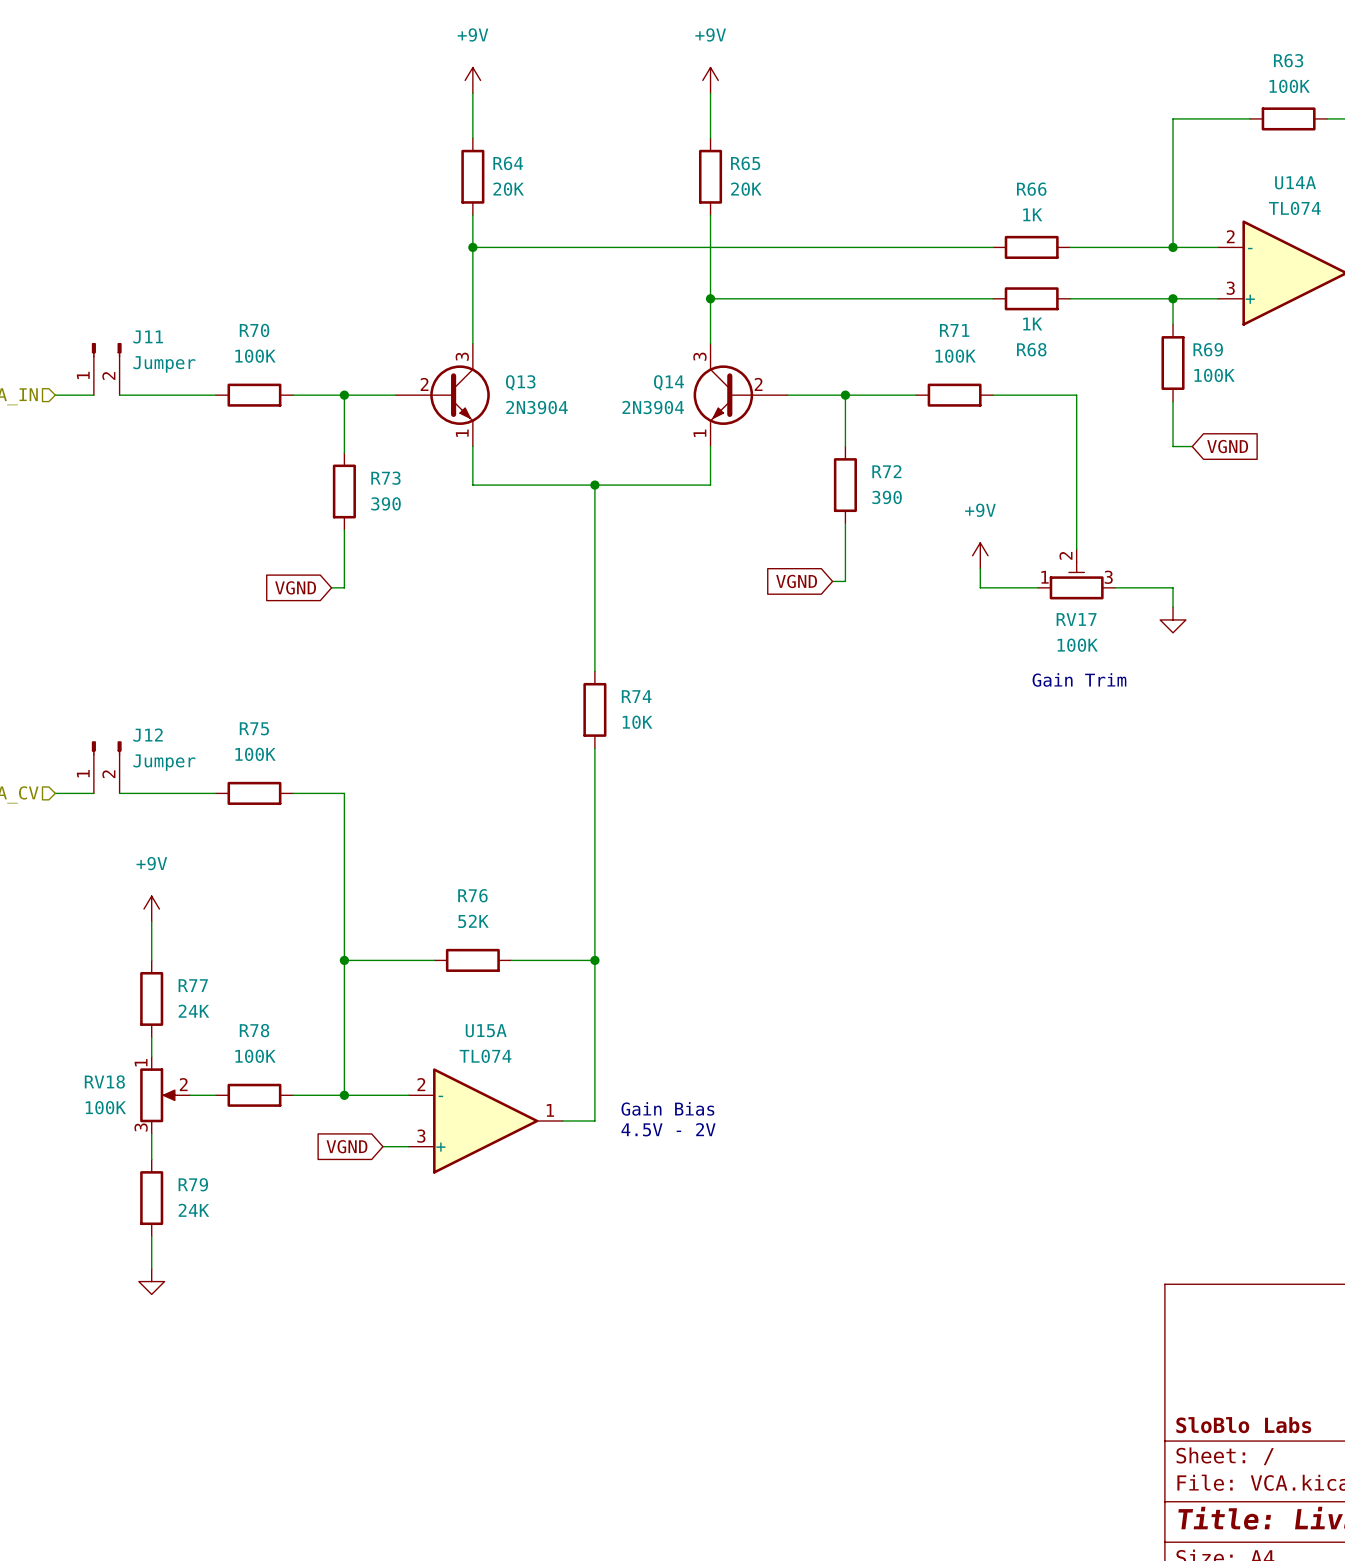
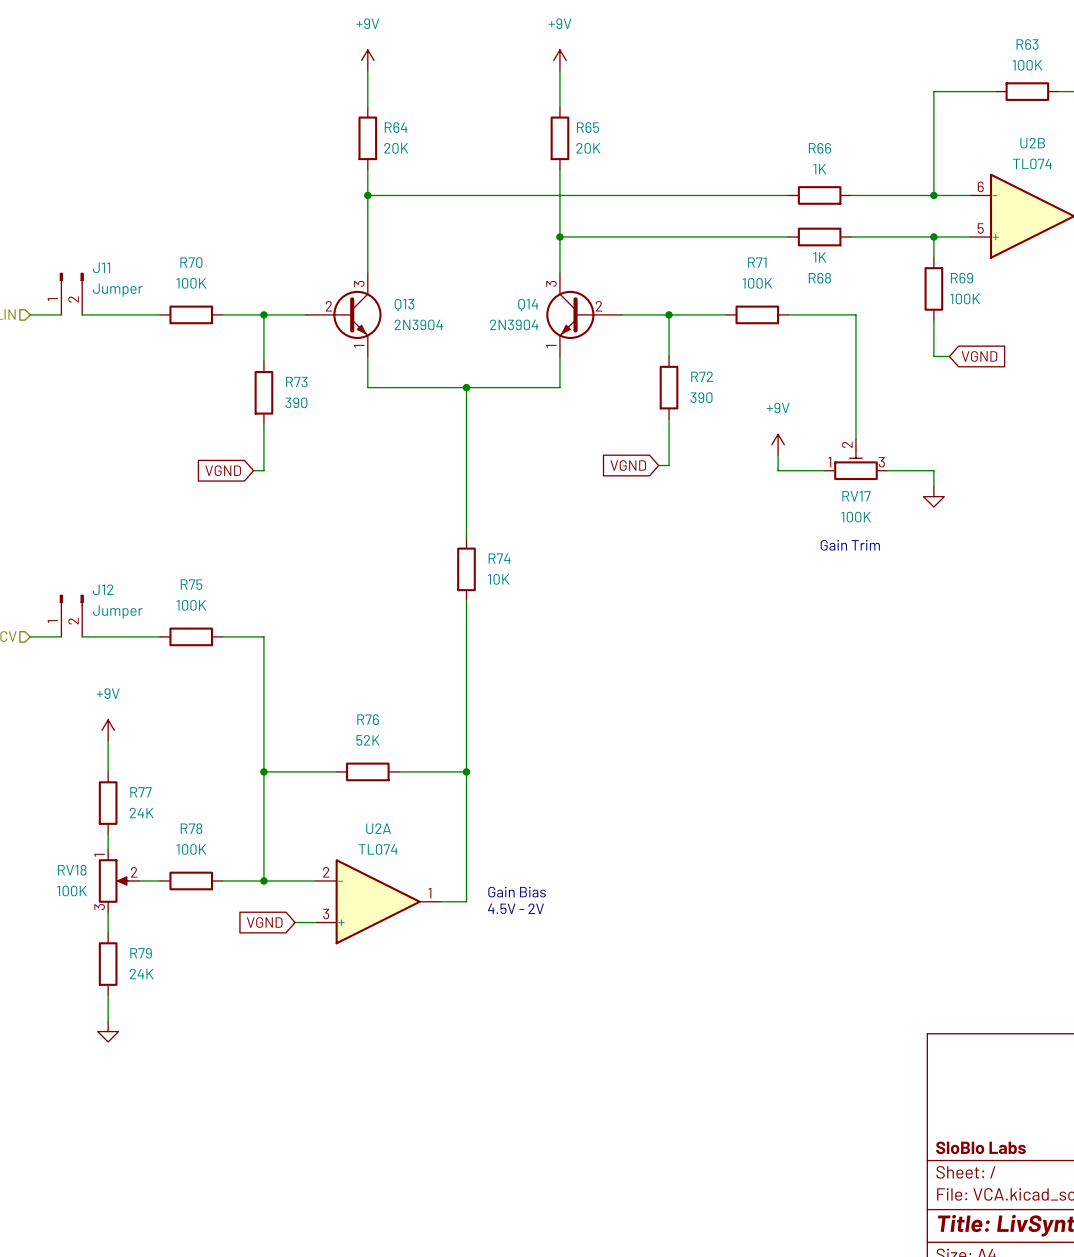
U14A name: U14A (1295, 182) -> U2B (1032, 143)
U14A pin number: 2 (1230, 236) -> 6 (980, 186)
U14A pin number: 3 (1230, 288) -> 5 (980, 228)
U15A name: U15A (486, 1030) -> U2A (378, 828)

